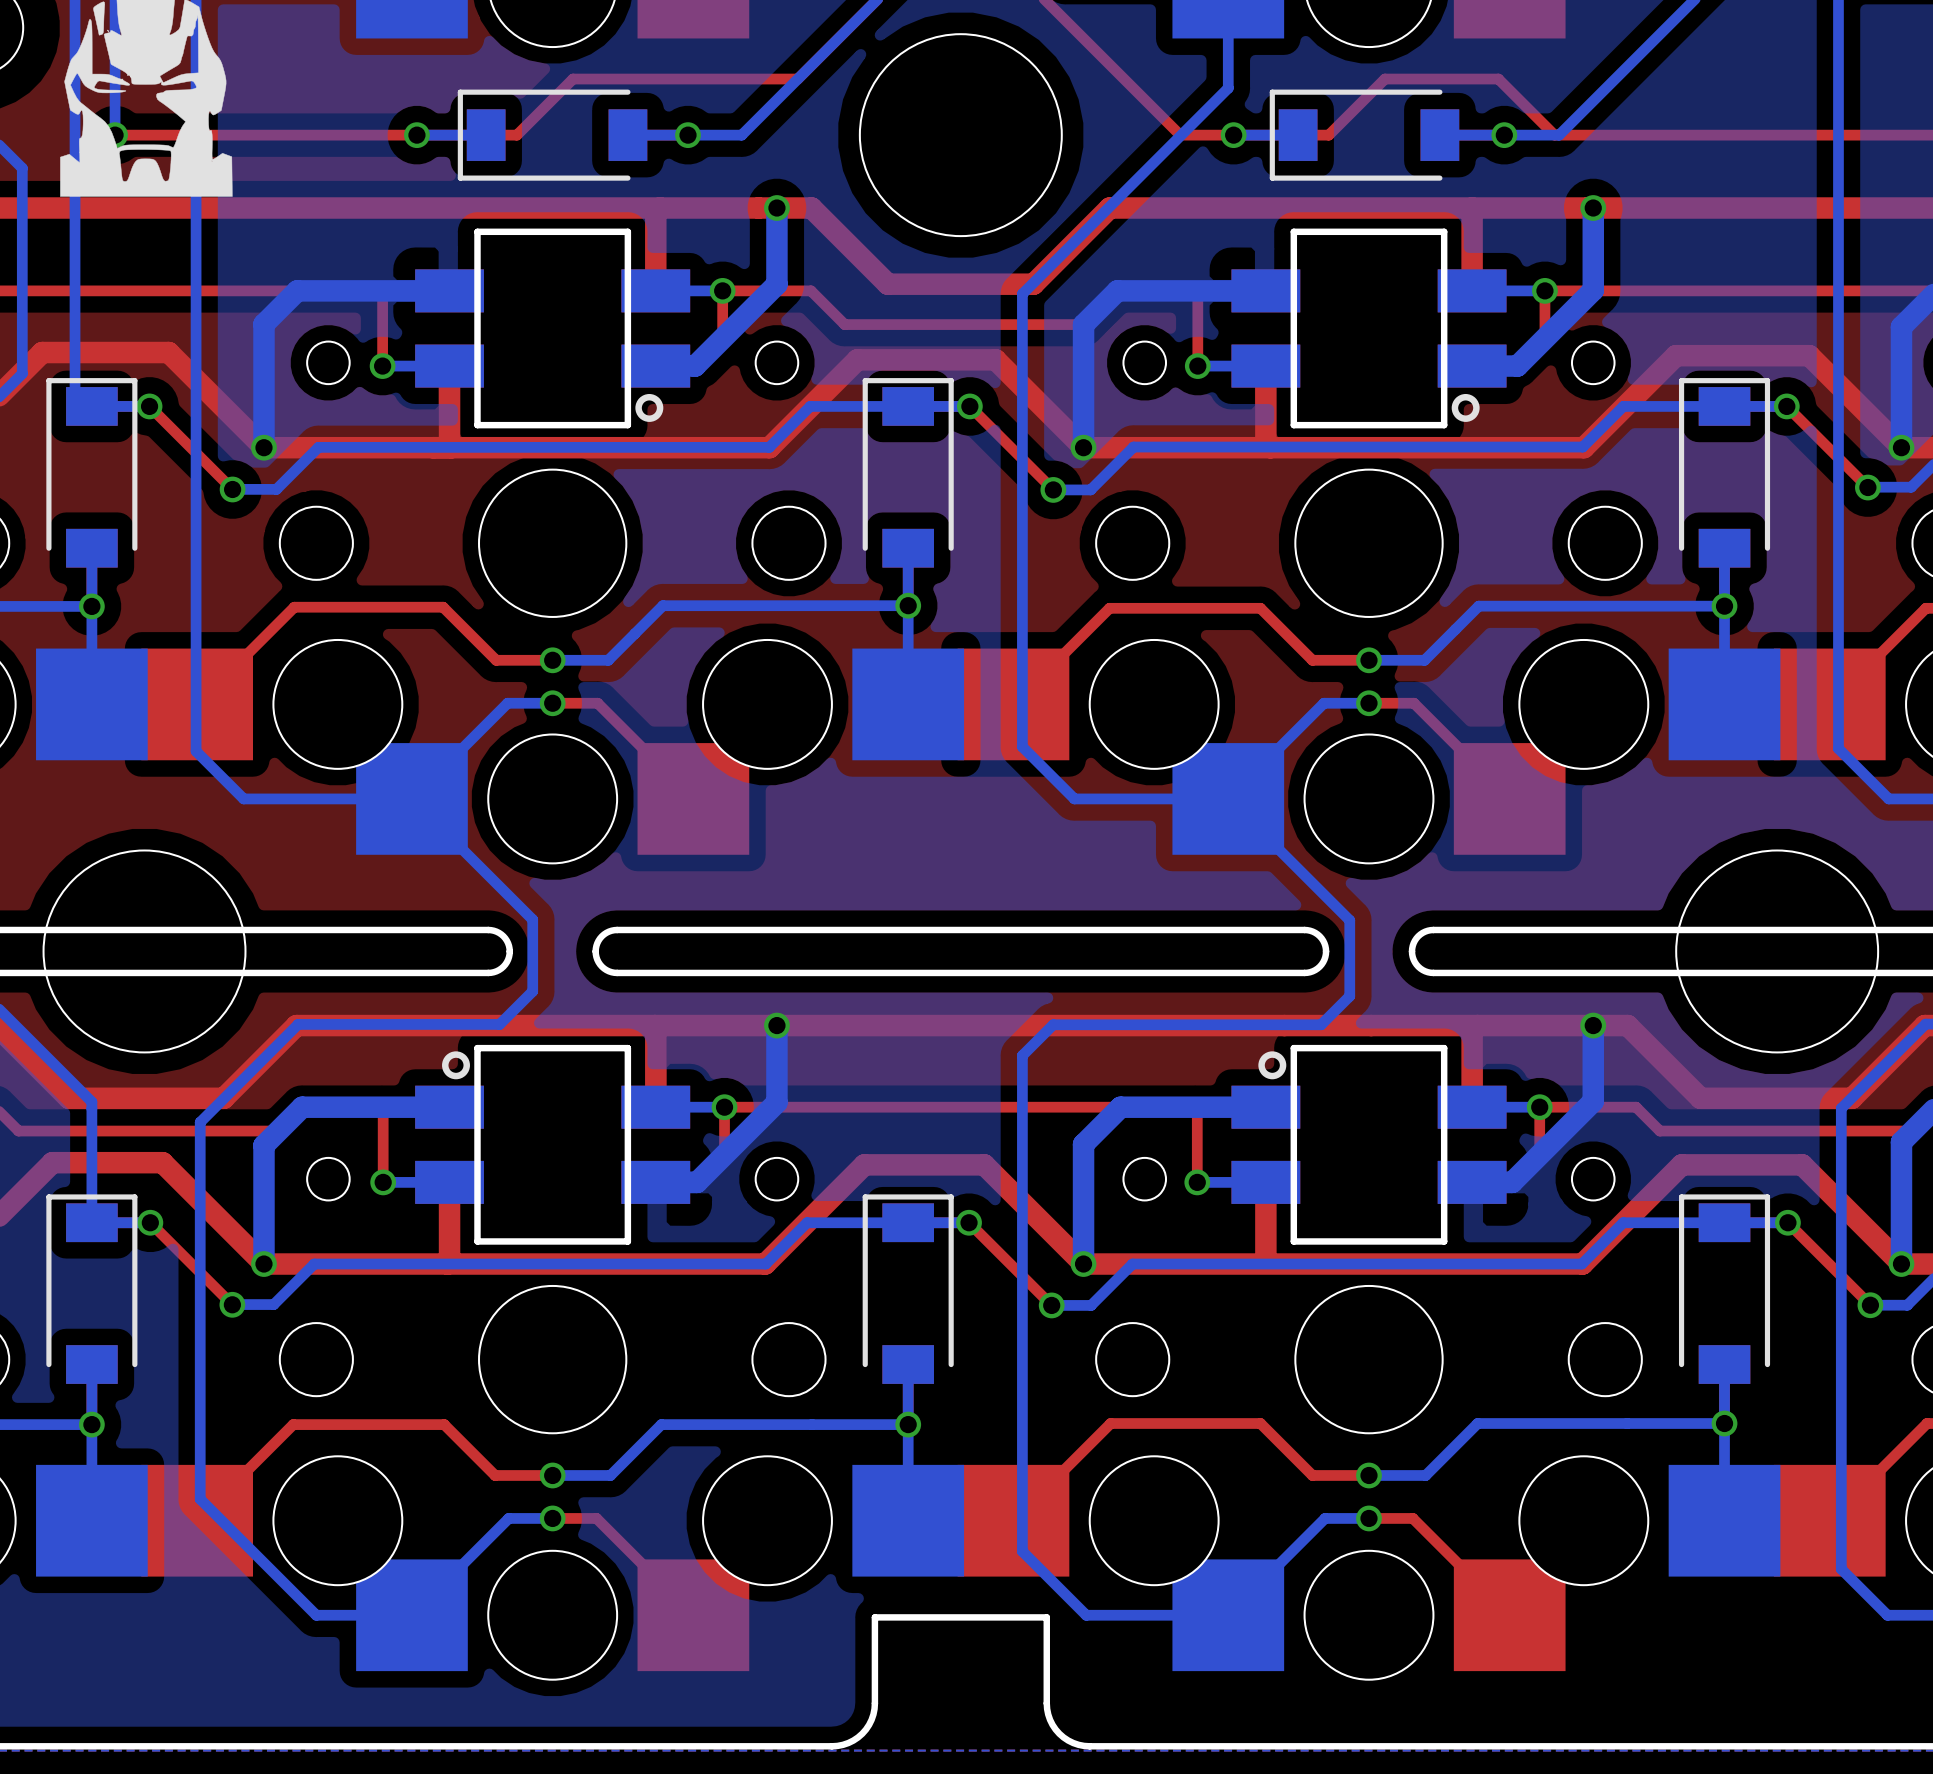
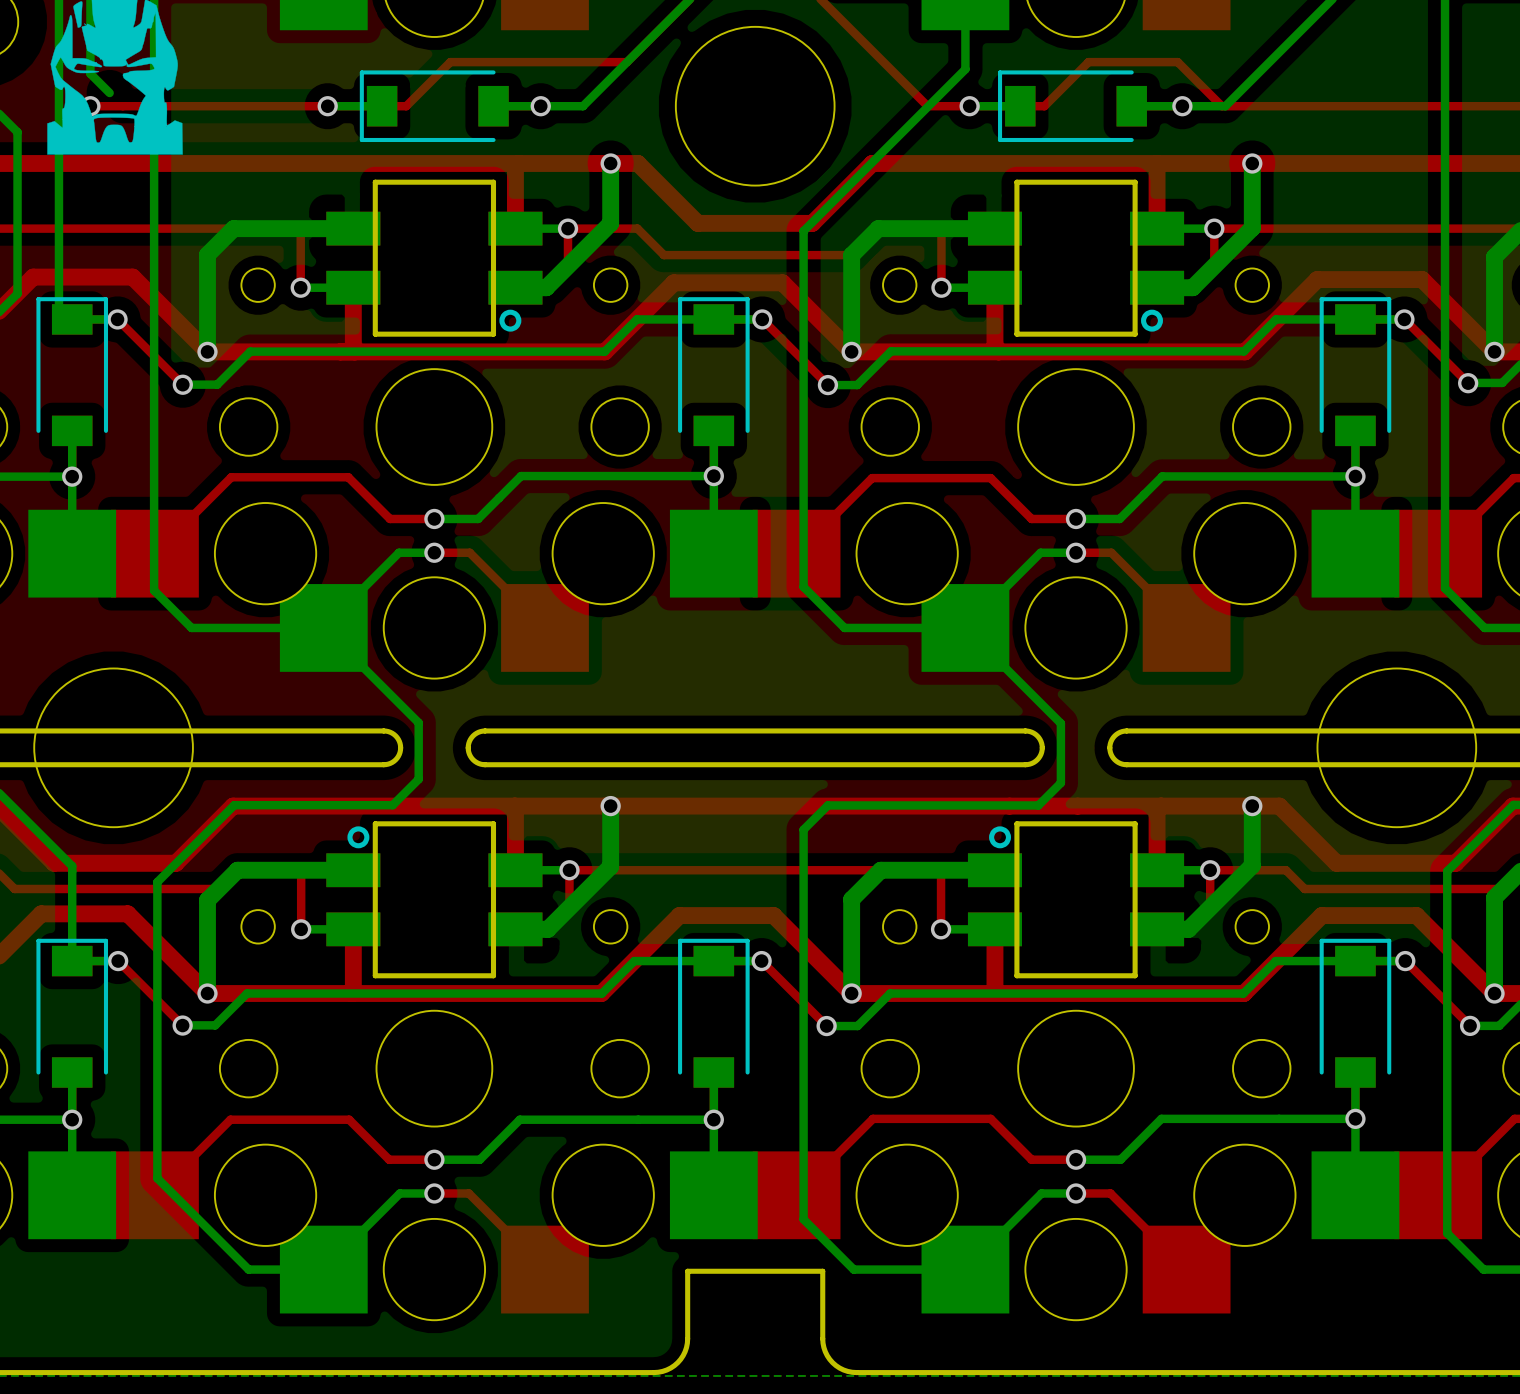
bottom track: (115, 93) (115, 135) -> (90, 73) (109, 93)

